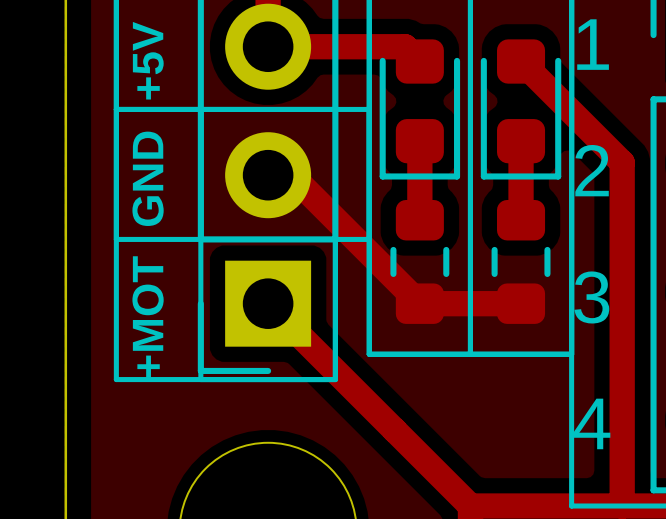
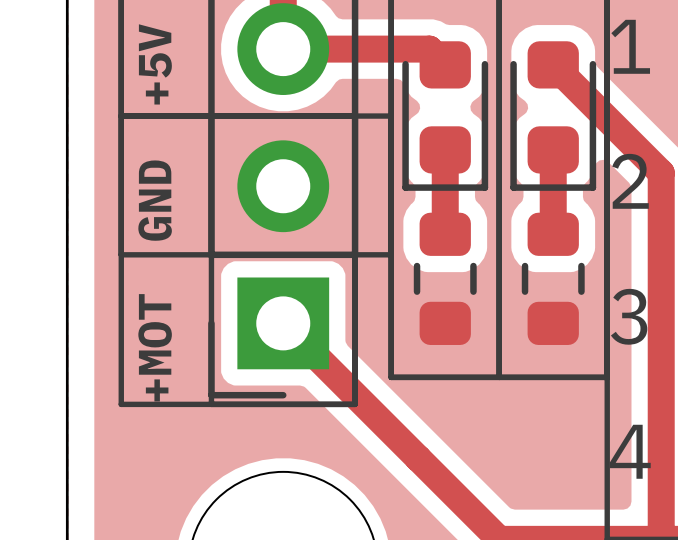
track: (268, 175) (291, 175) (419, 303) (521, 303) -> none

